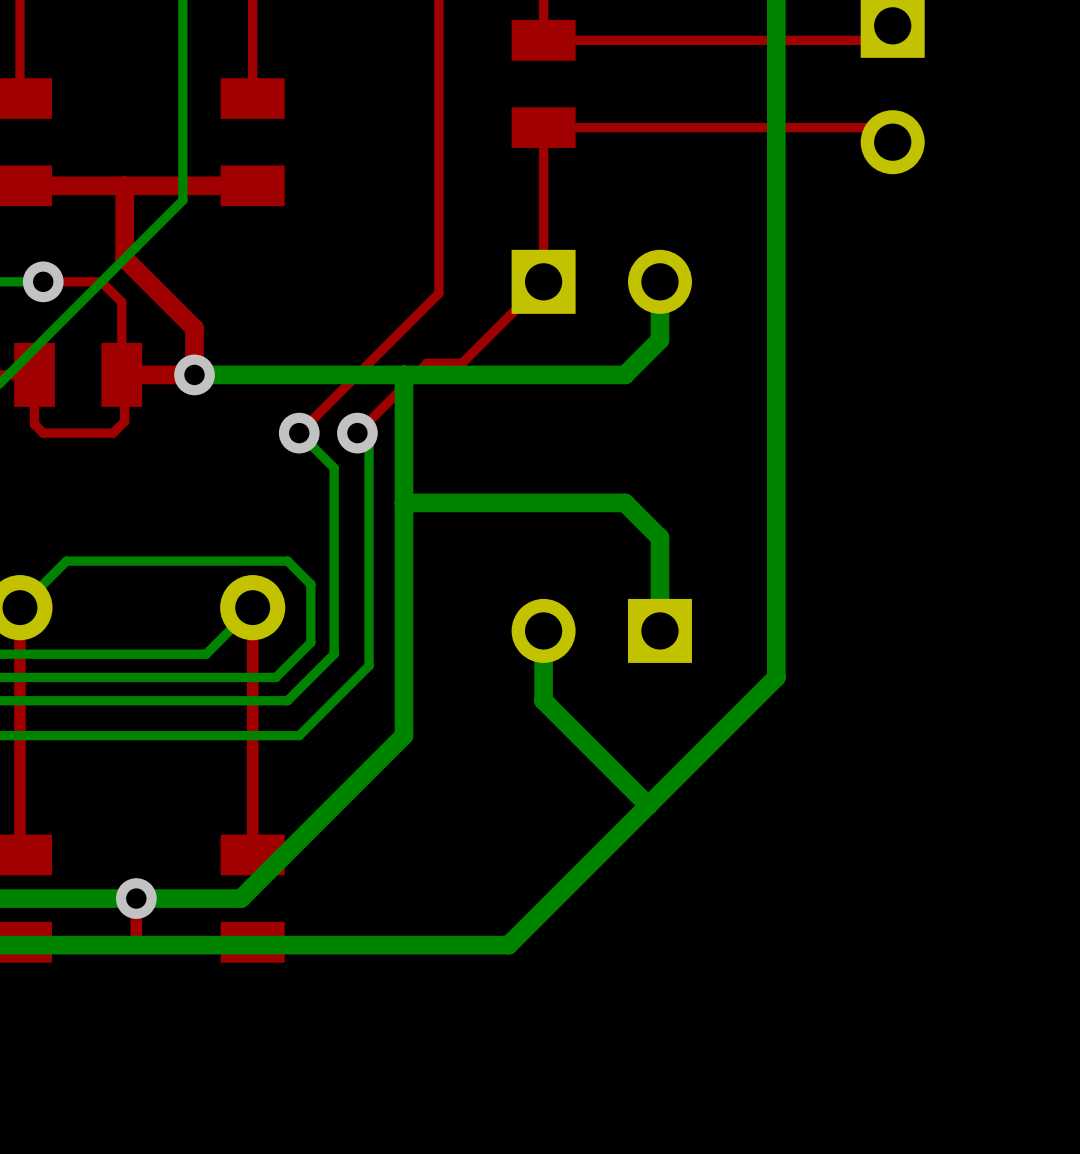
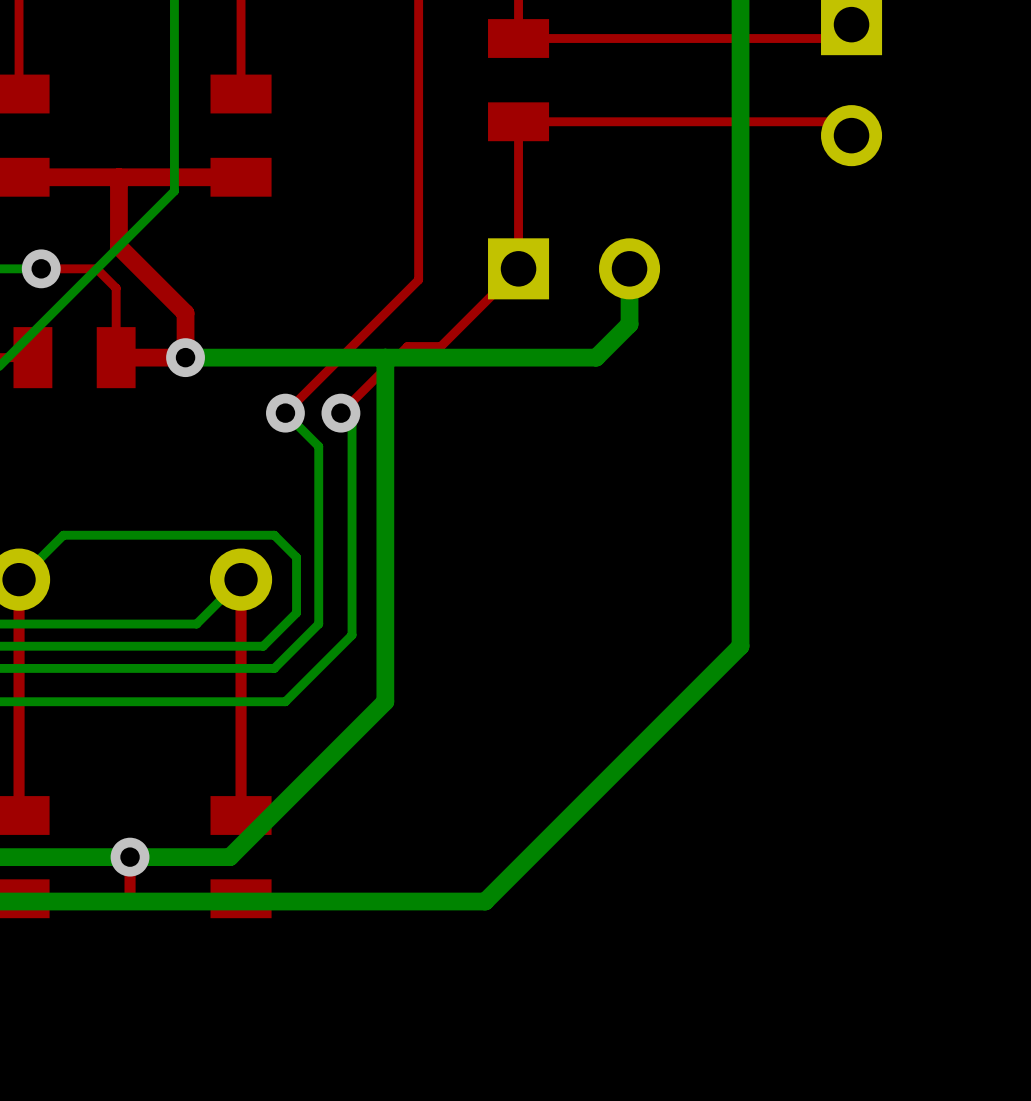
top track: (121, 374) (124, 377) (124, 421) (113, 433) (43, 433) (34, 424) (34, 374) -> none
bottom track: (403, 502) (625, 502) (659, 537) (659, 630) -> none
bottom track: (543, 630) (543, 700) (648, 805) -> none
part: (601, 630) -> none

